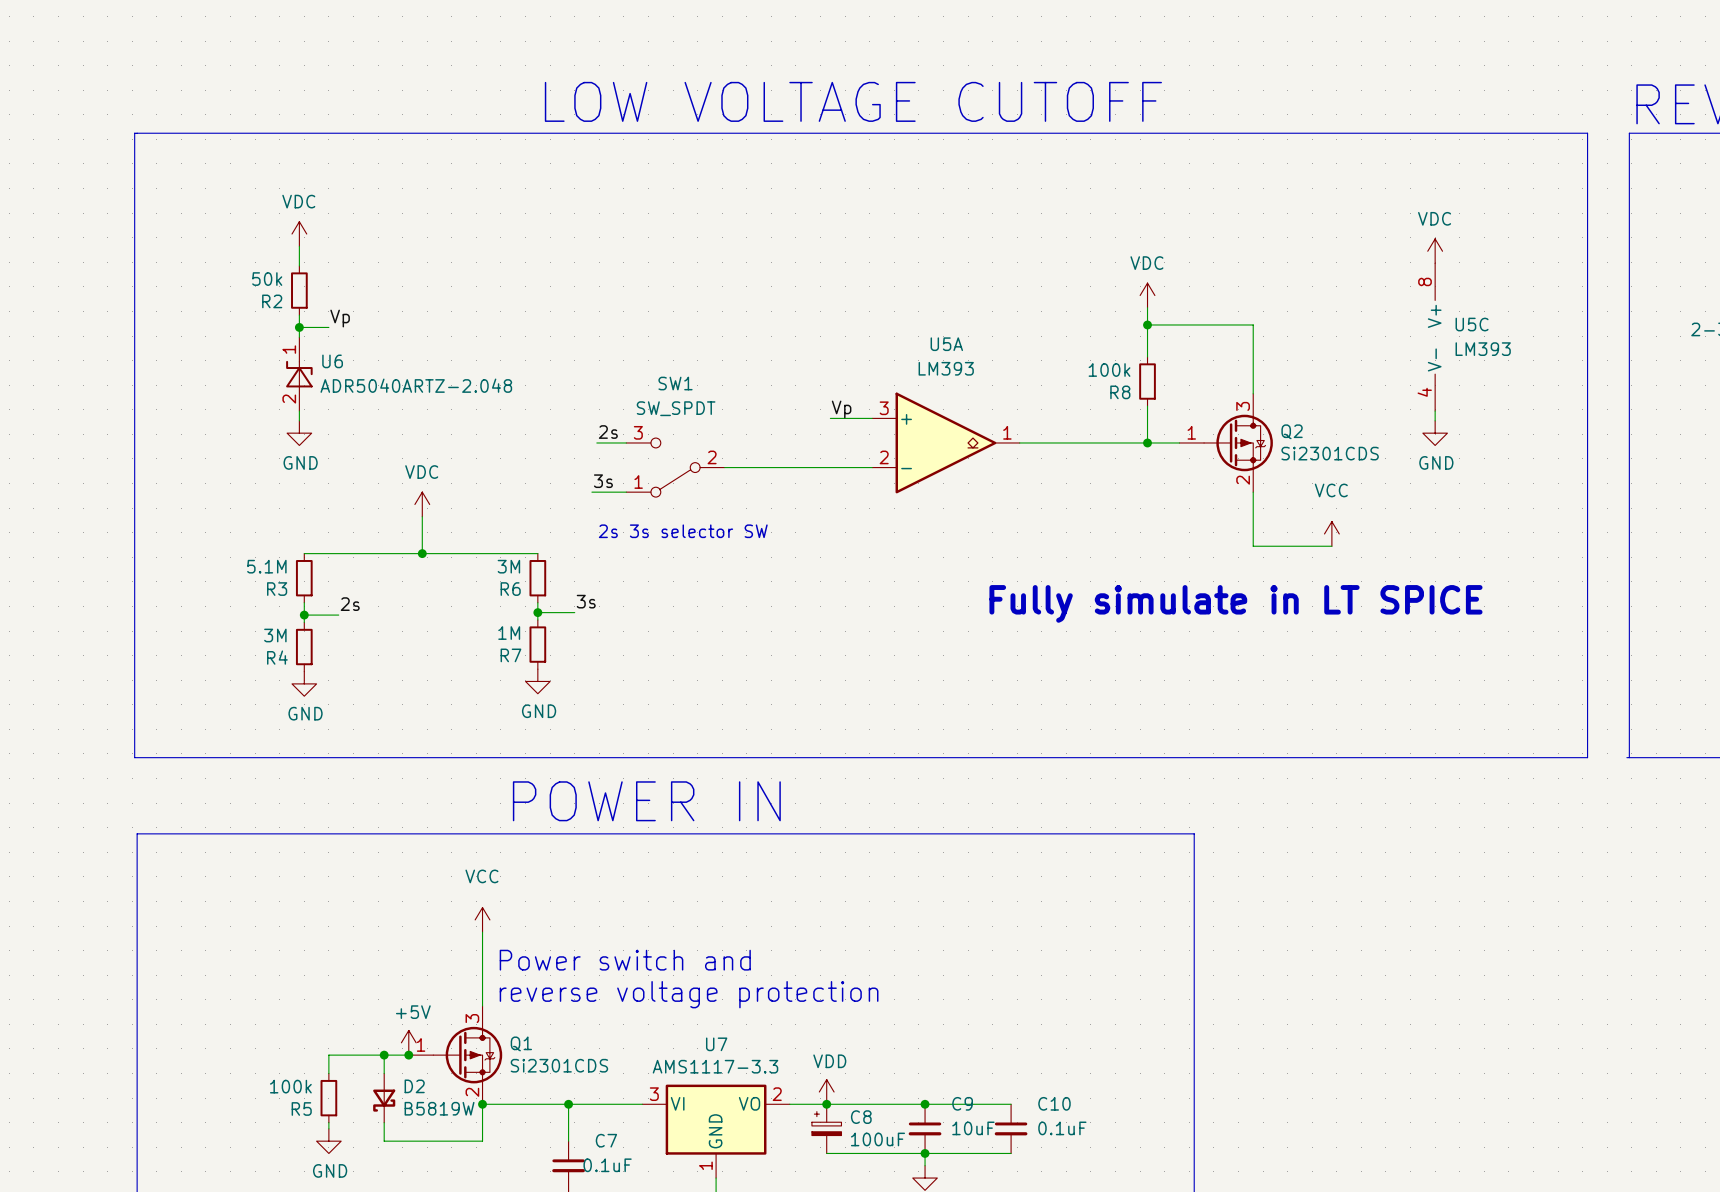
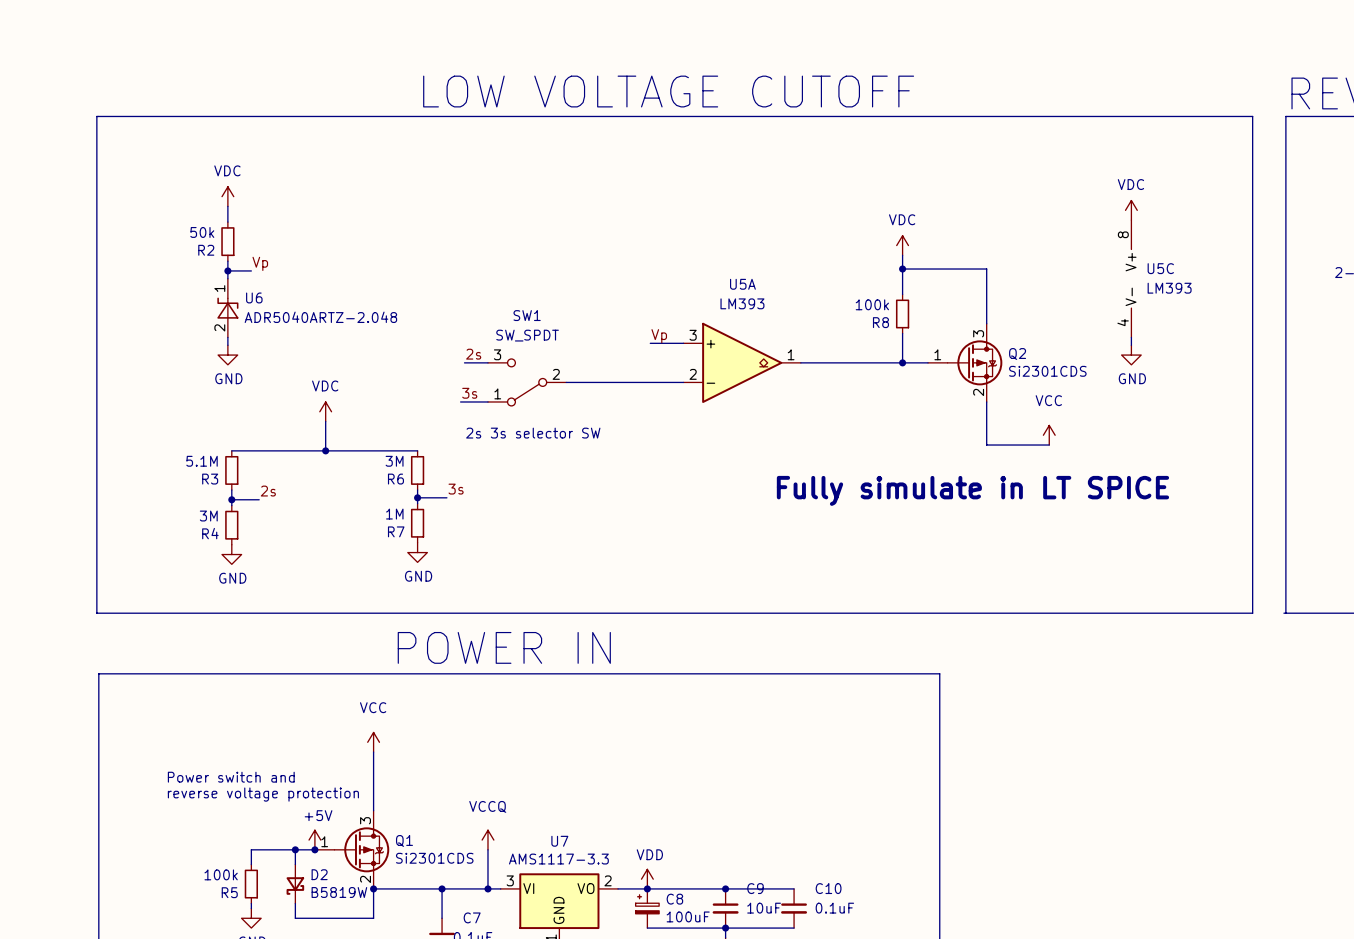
text: Power switch and (625, 960) -> none
text: none -> Power switch and (231, 777)
text: none -> reverse voltage protection (263, 794)
text: reverse voltage protection (689, 994) -> none
power symbol: none -> VCCQ (487, 840)
wire: none -> (487, 849) (487, 888)
junction: none -> (487, 888)

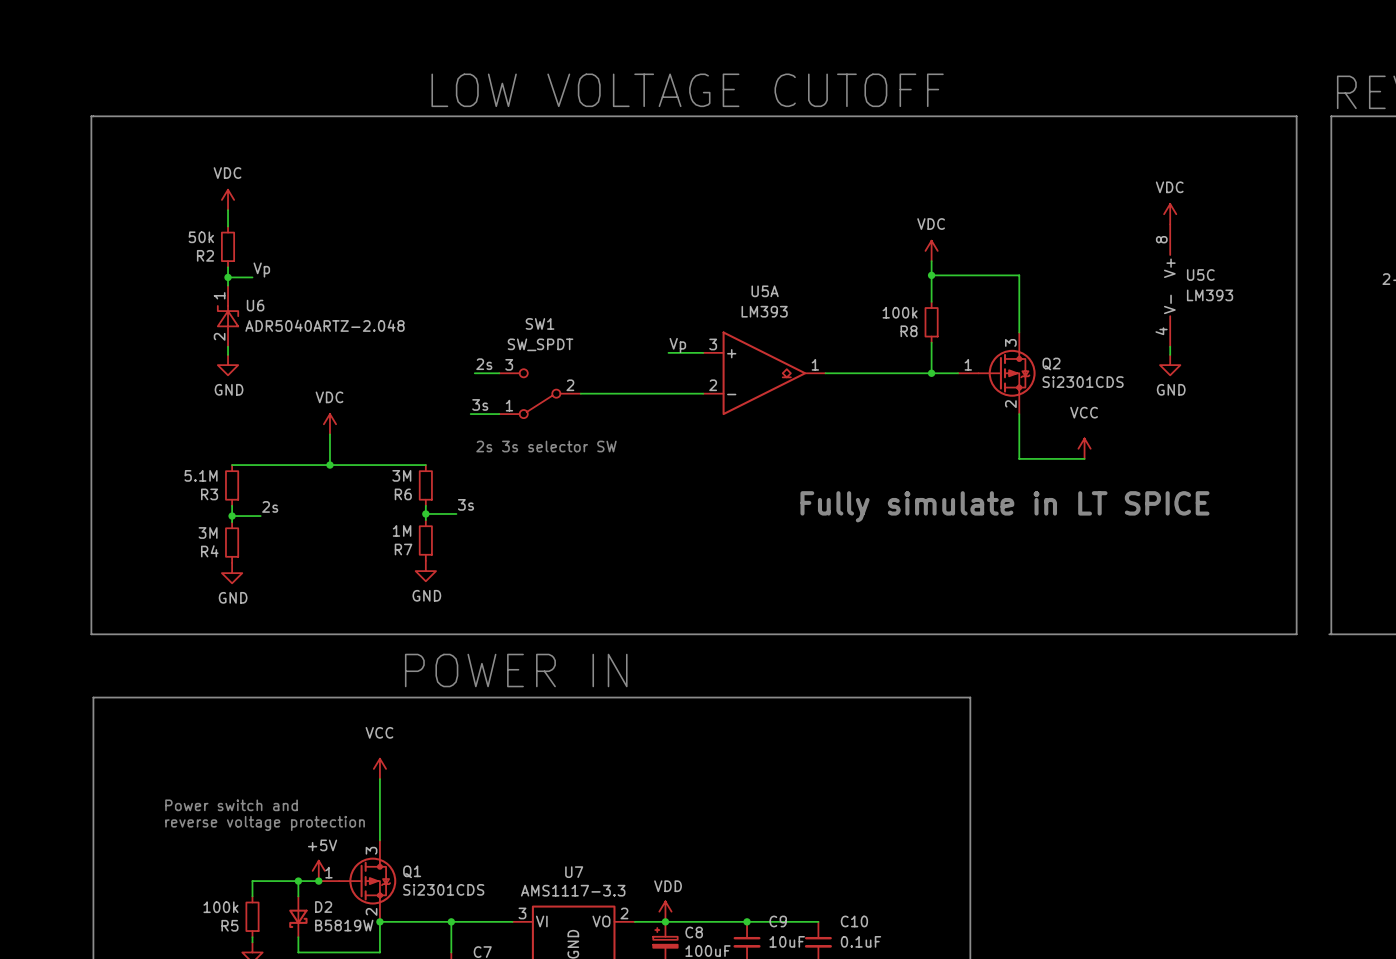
power symbol: VCCQ (487, 840) -> none
wire: (487, 849) (487, 888) -> none
junction: (487, 888) -> none

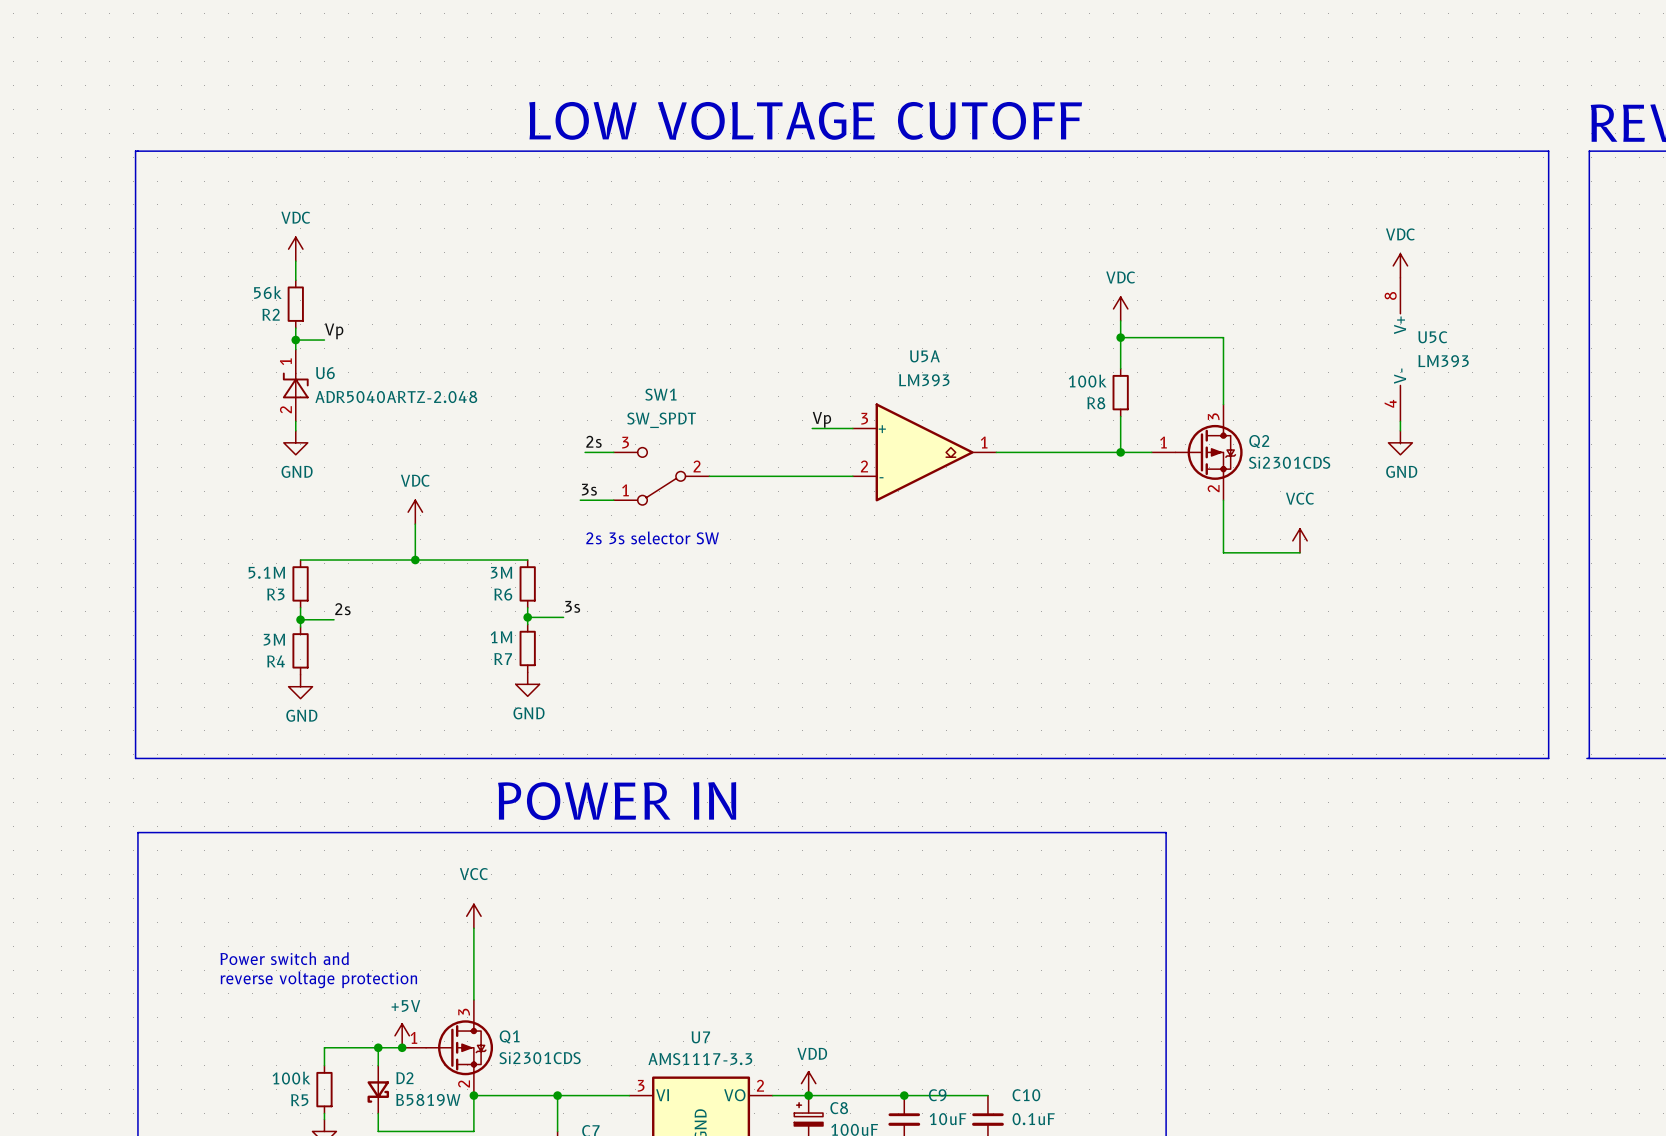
R2 value: 50k (201, 237) -> 56k (267, 292)
text: Fully simulate in LT SPICE (1004, 506) -> none

